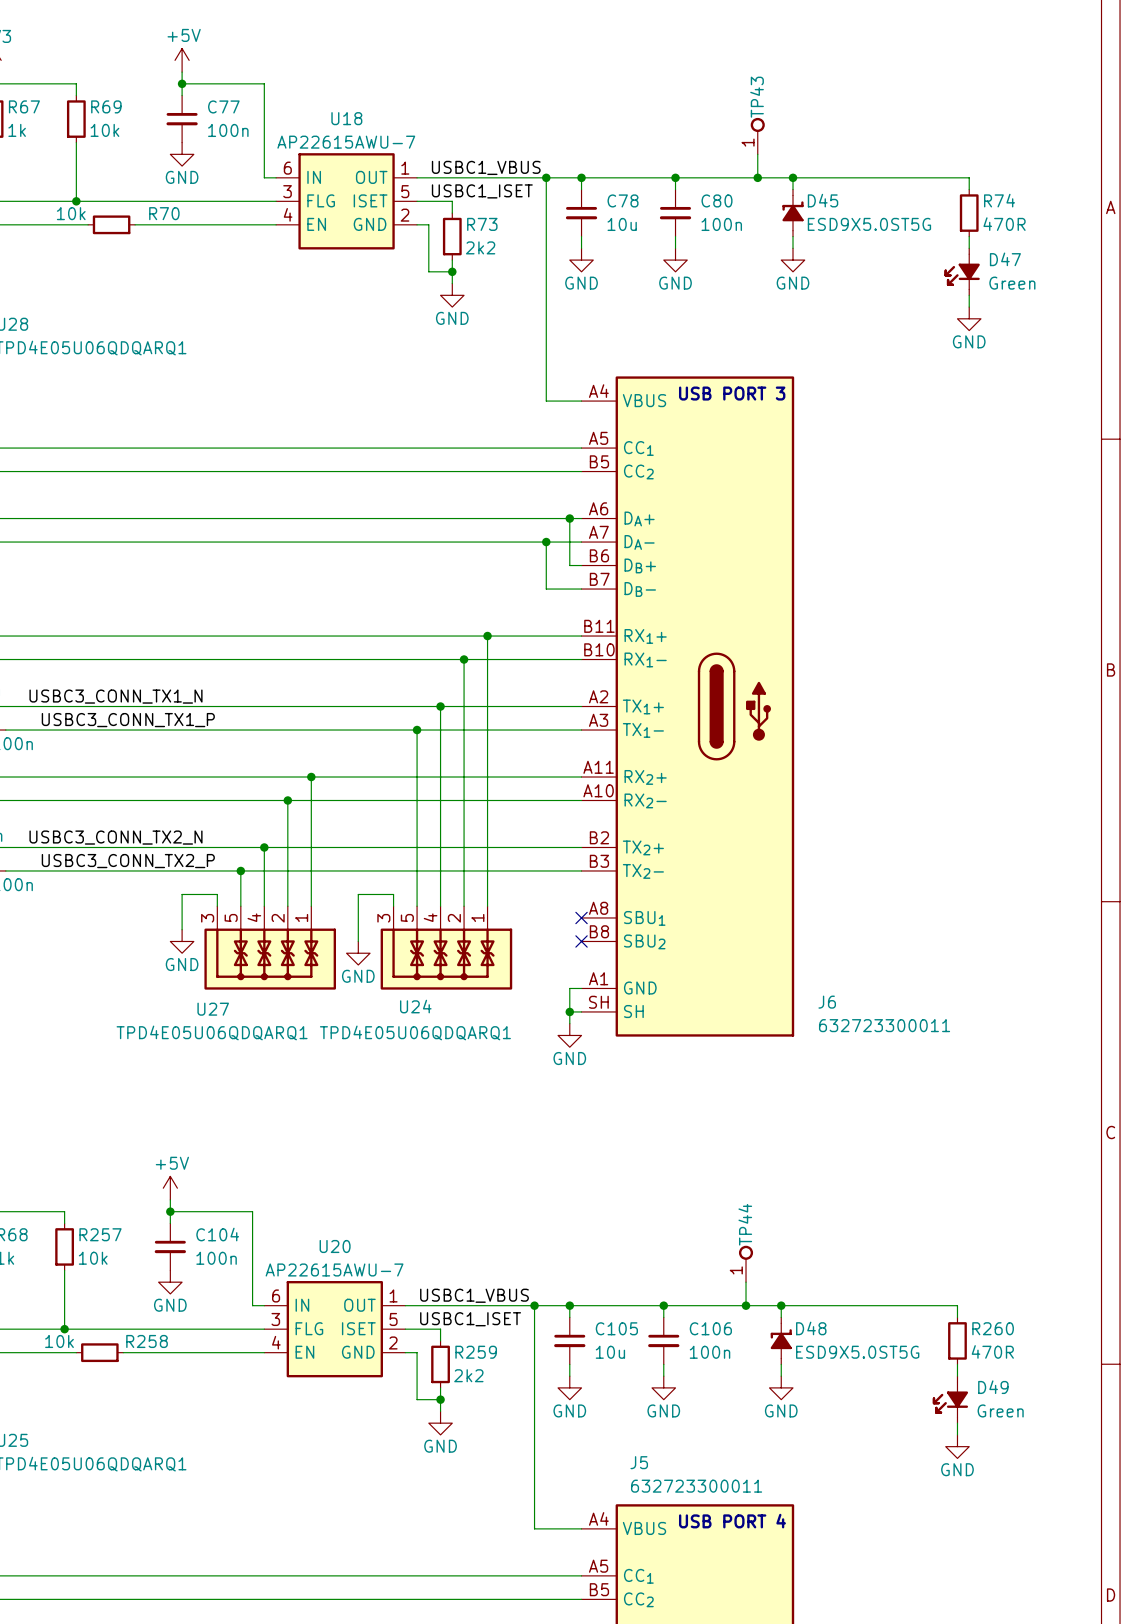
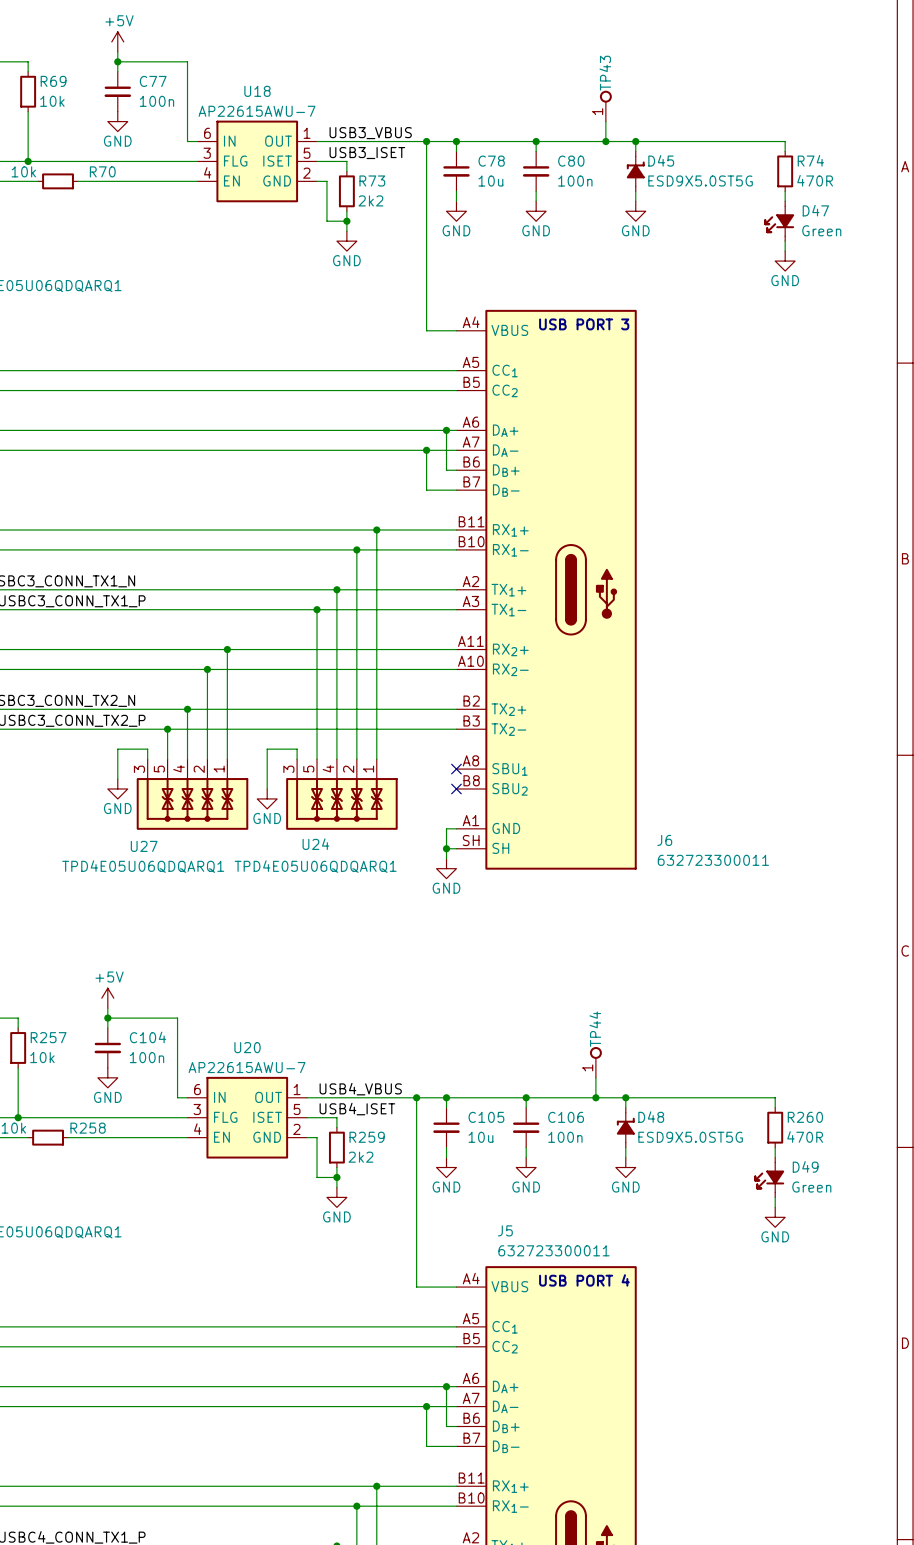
label: USBC1_VBUS (486, 167) -> USB3_VBUS (370, 133)
label: USBC1_ISET (482, 191) -> USB3_ISET (367, 153)
label: USBC1_VBUS (474, 1295) -> USB4_VBUS (360, 1089)
label: USBC1_ISET (470, 1319) -> USB4_ISET (357, 1109)

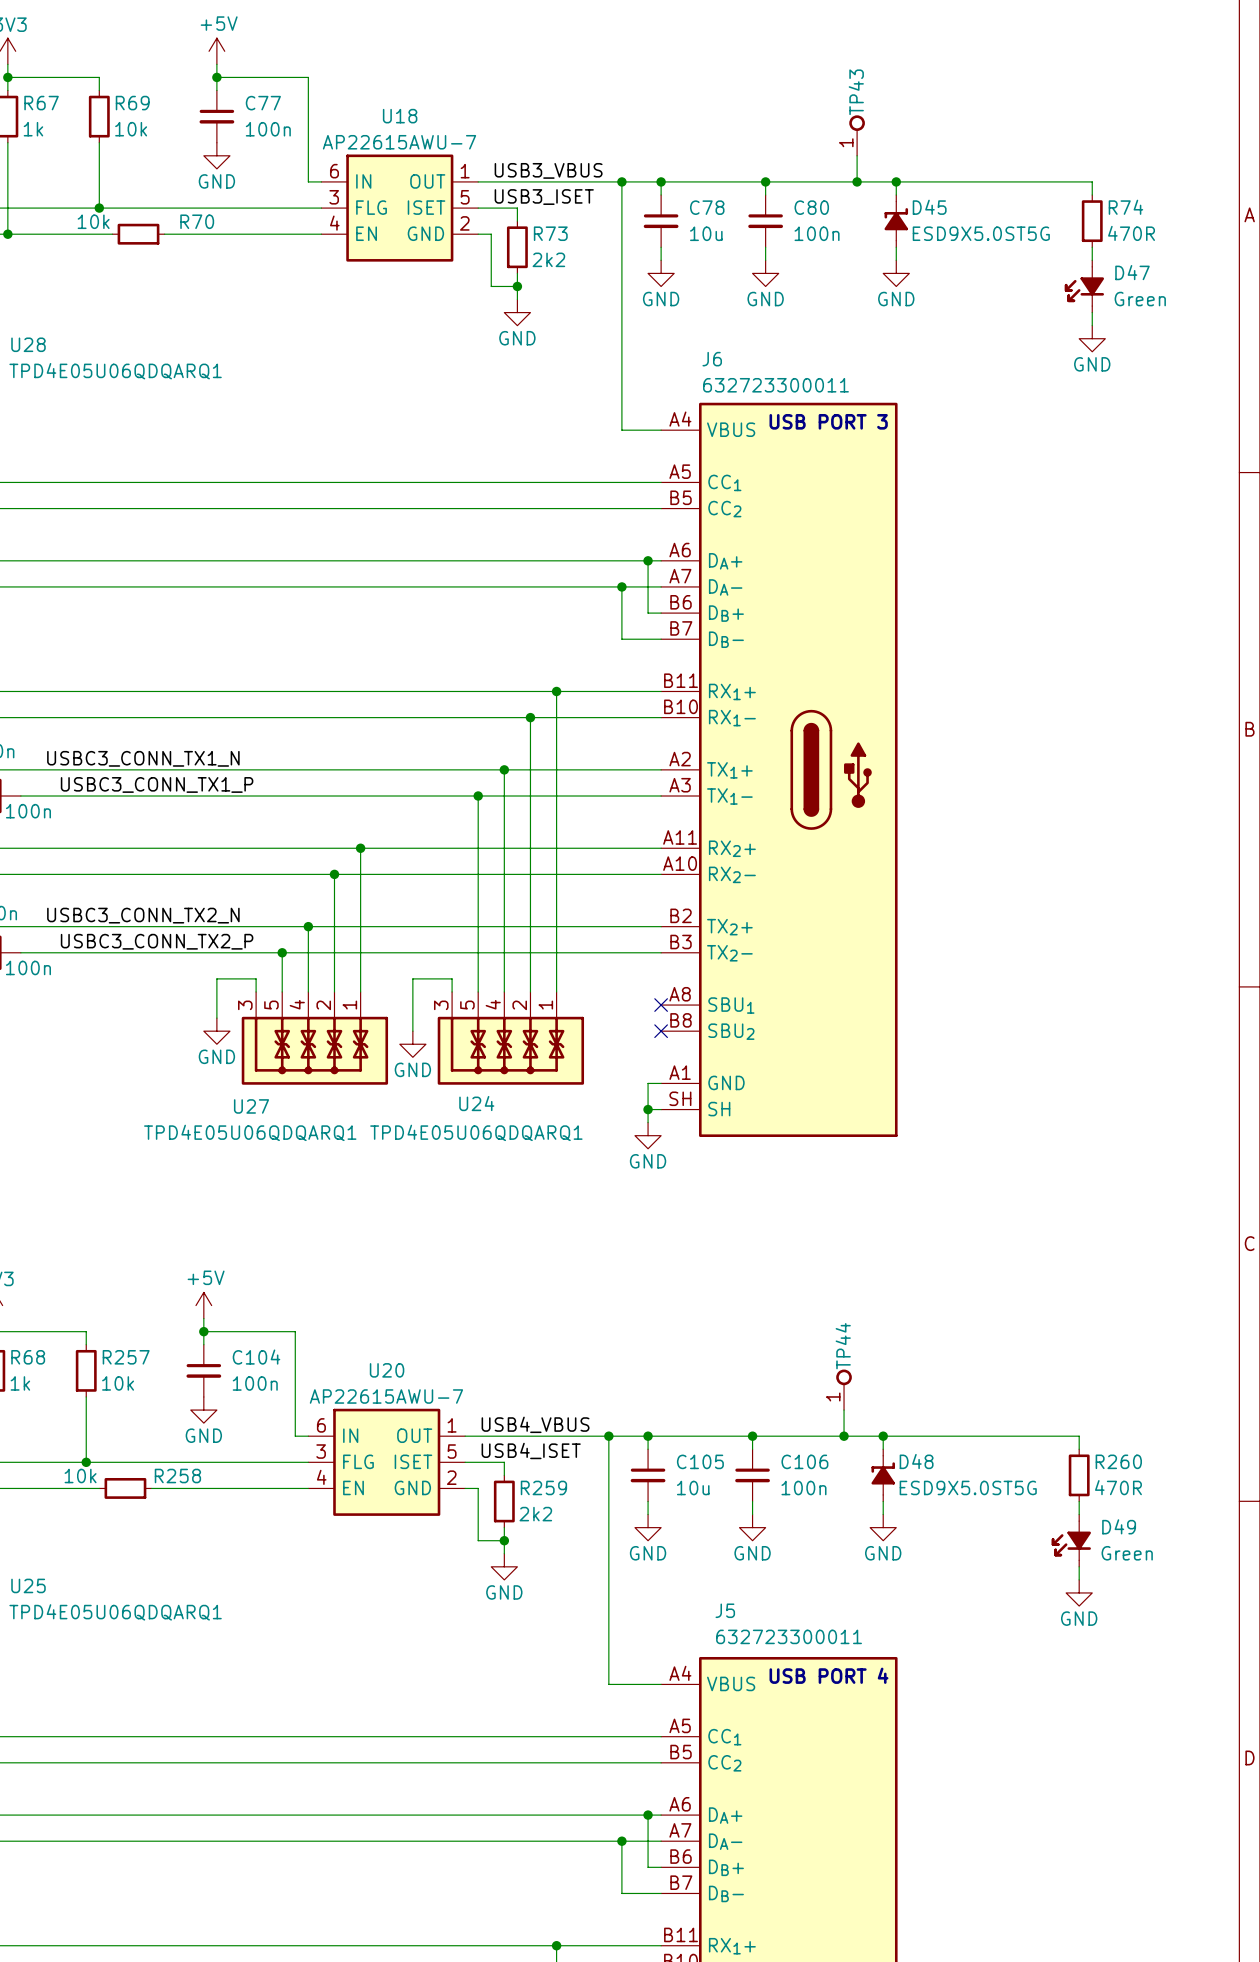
J6 name position: J6 (664, 840) -> J6 (712, 359)
J6 text position: 632723300011 (713, 860) -> 632723300011 (775, 385)

